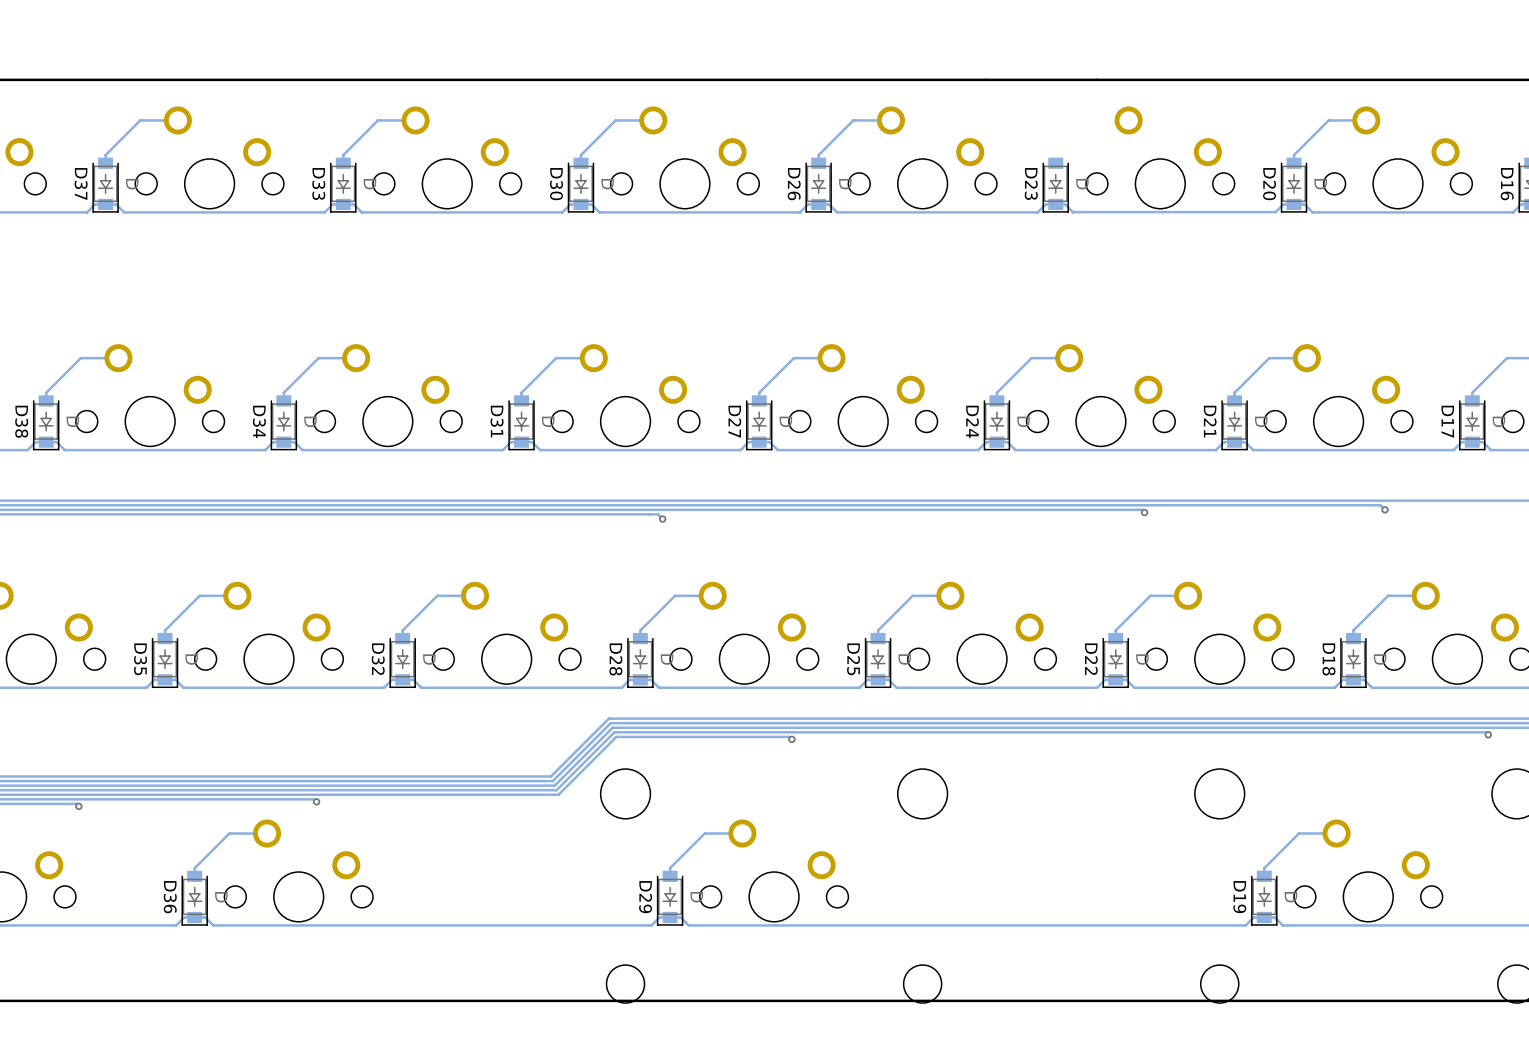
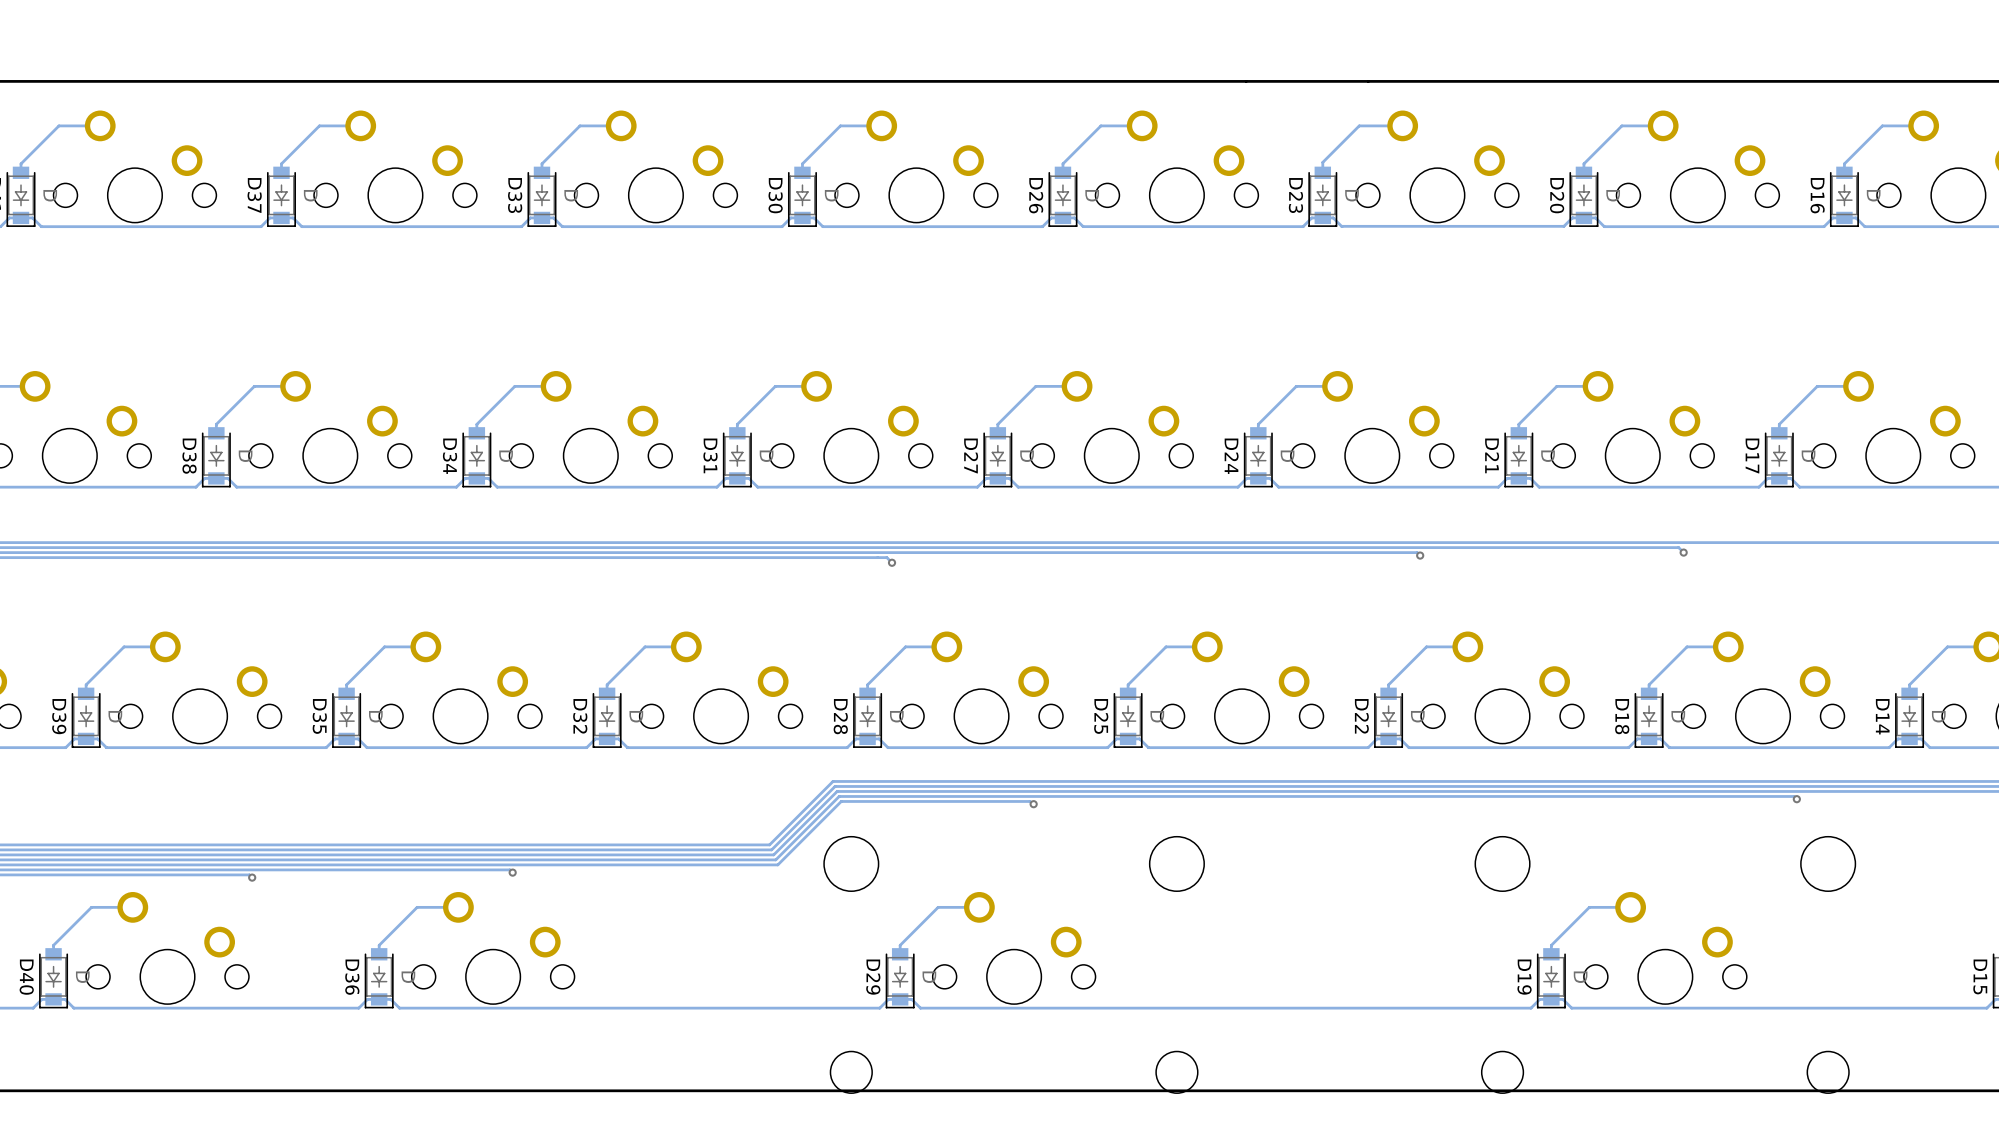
track: none -> (1402, 125) (1359, 125) (1322, 162) (1322, 172)

